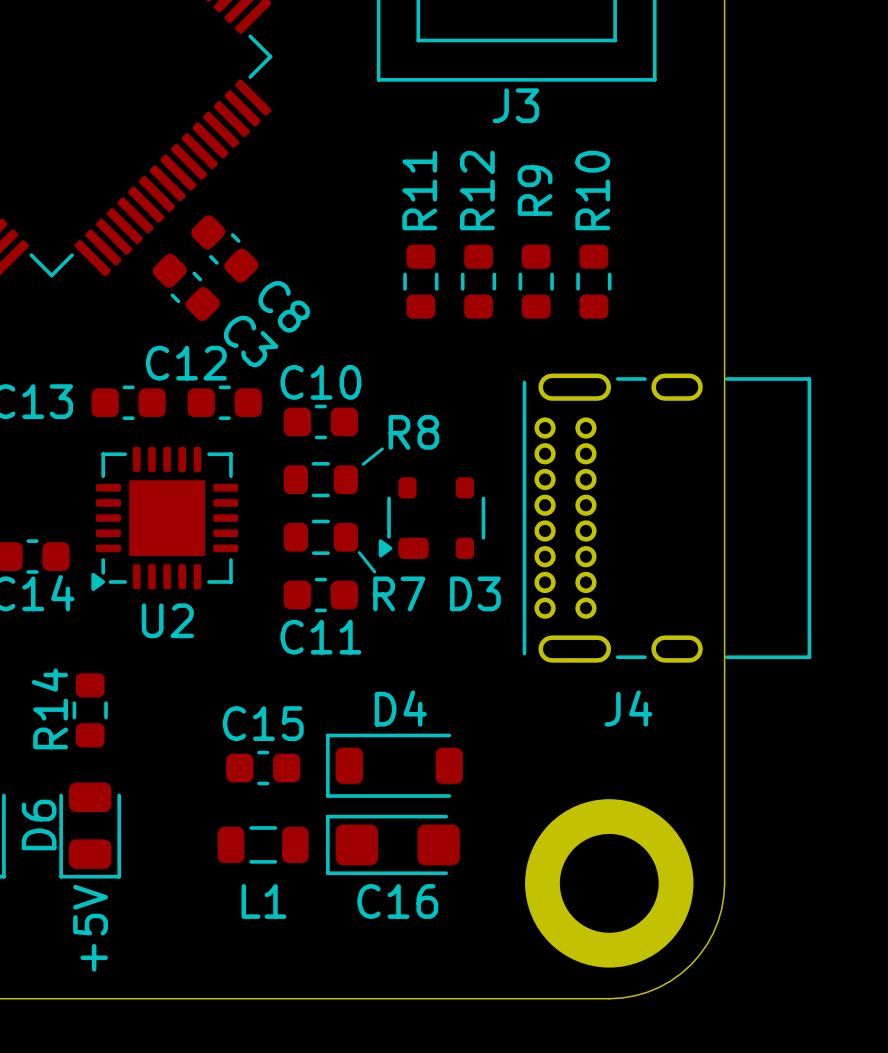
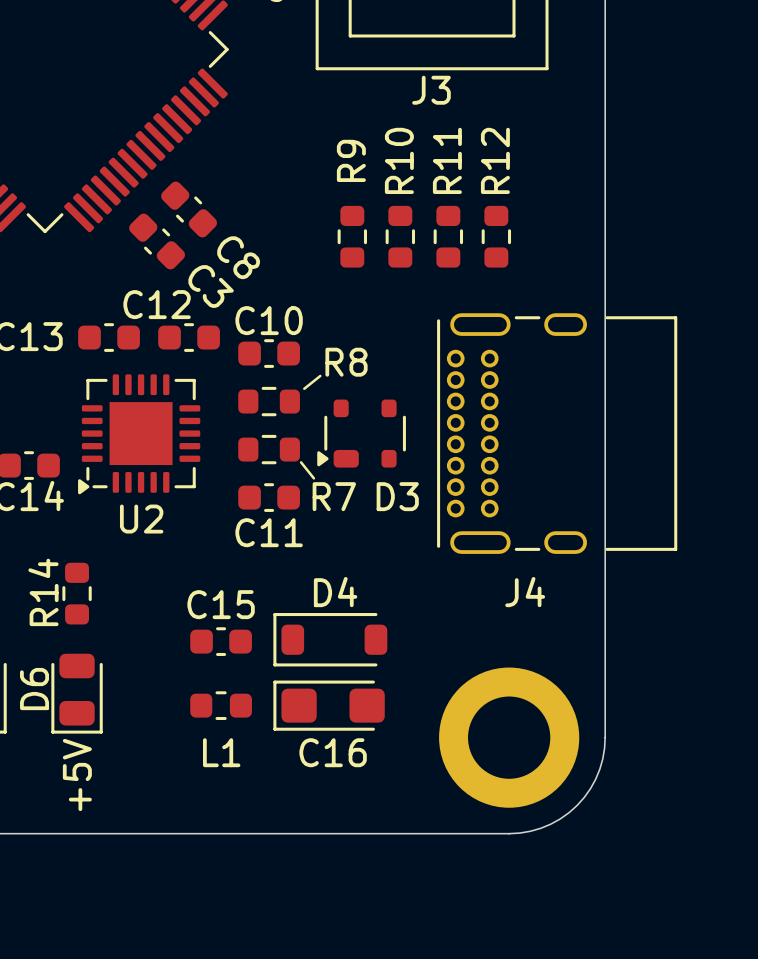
R11 name: R11 (419, 190) -> R9 (351, 160)
R12 name: R12 (477, 190) -> R10 (399, 160)
R9 name: R9 (535, 190) -> R11 (447, 160)
R10 name: R10 (592, 190) -> R12 (495, 160)
L1 footprint: [217, 826, 309, 864] -> [190, 691, 252, 721]

